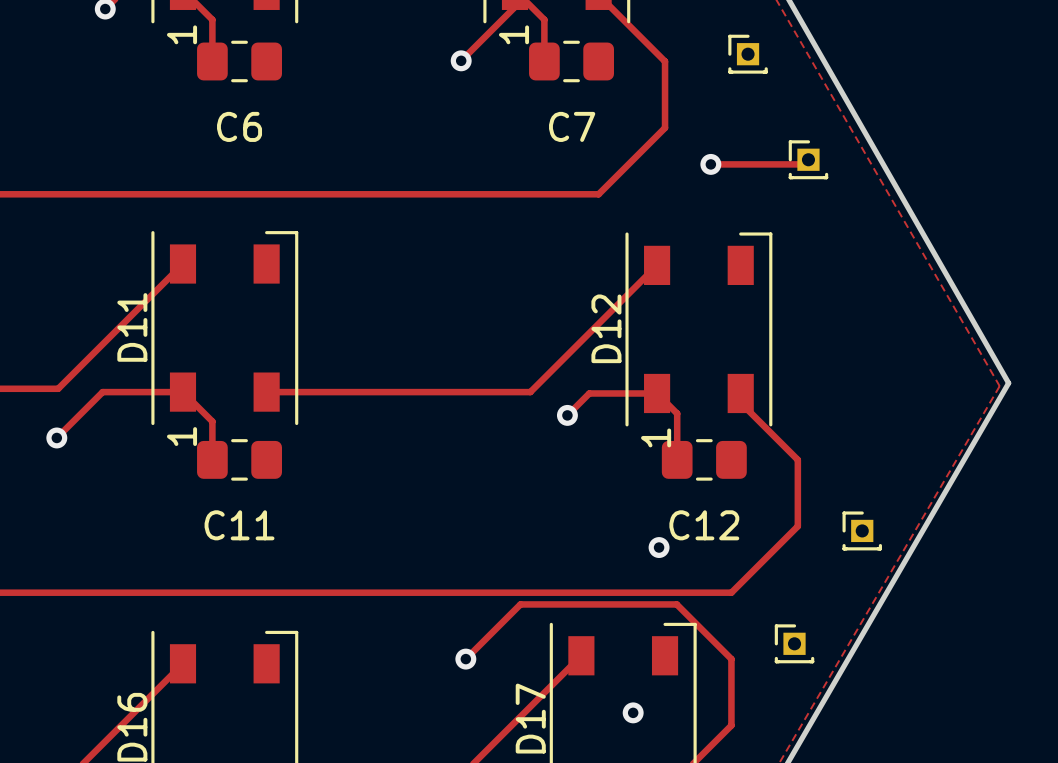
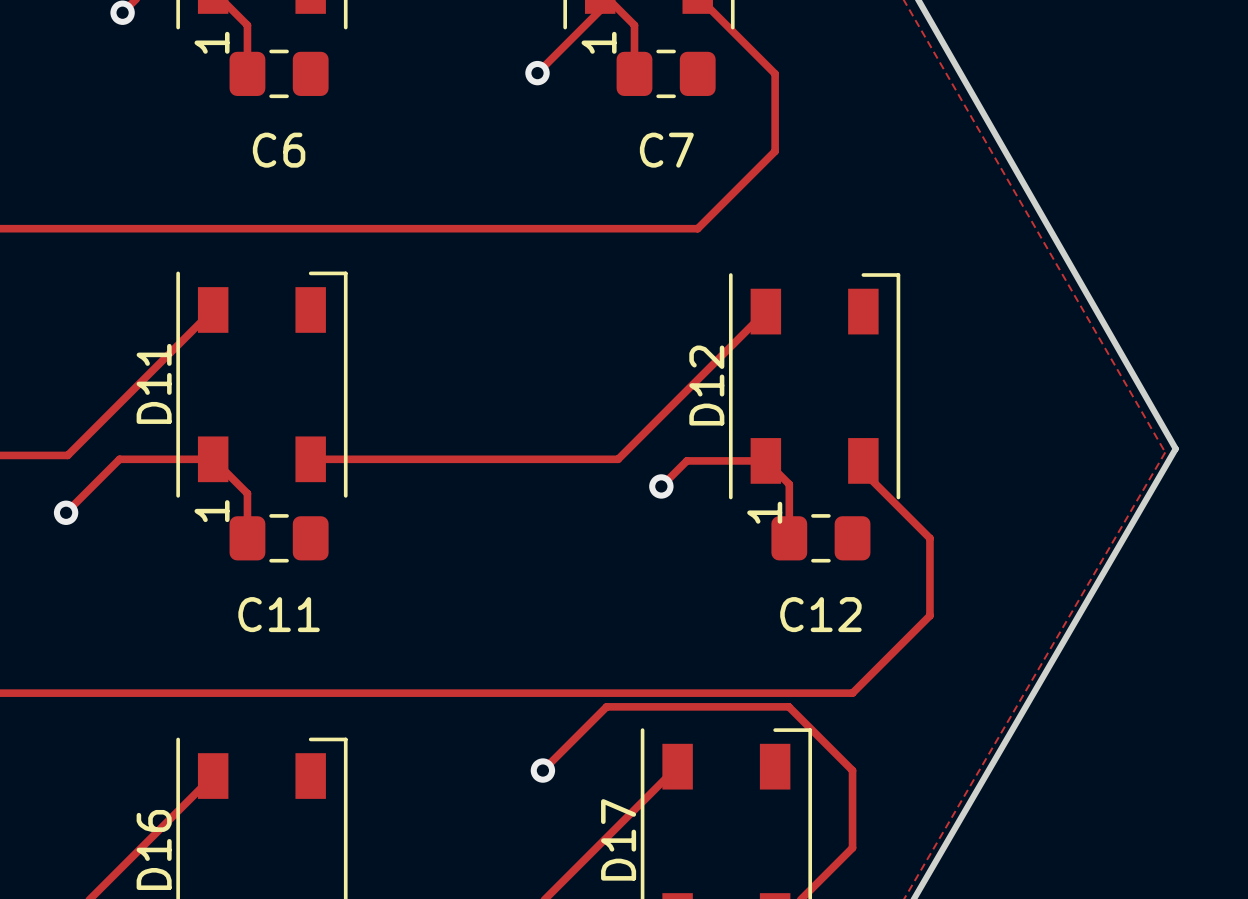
part: (748, 54) -> none
part: (808, 159) -> none
track: (710, 164) (807, 164) -> none
via: (710, 164) -> none
part: (862, 530) -> none
via: (659, 547) -> none
part: (794, 643) -> none
via: (633, 712) -> none

